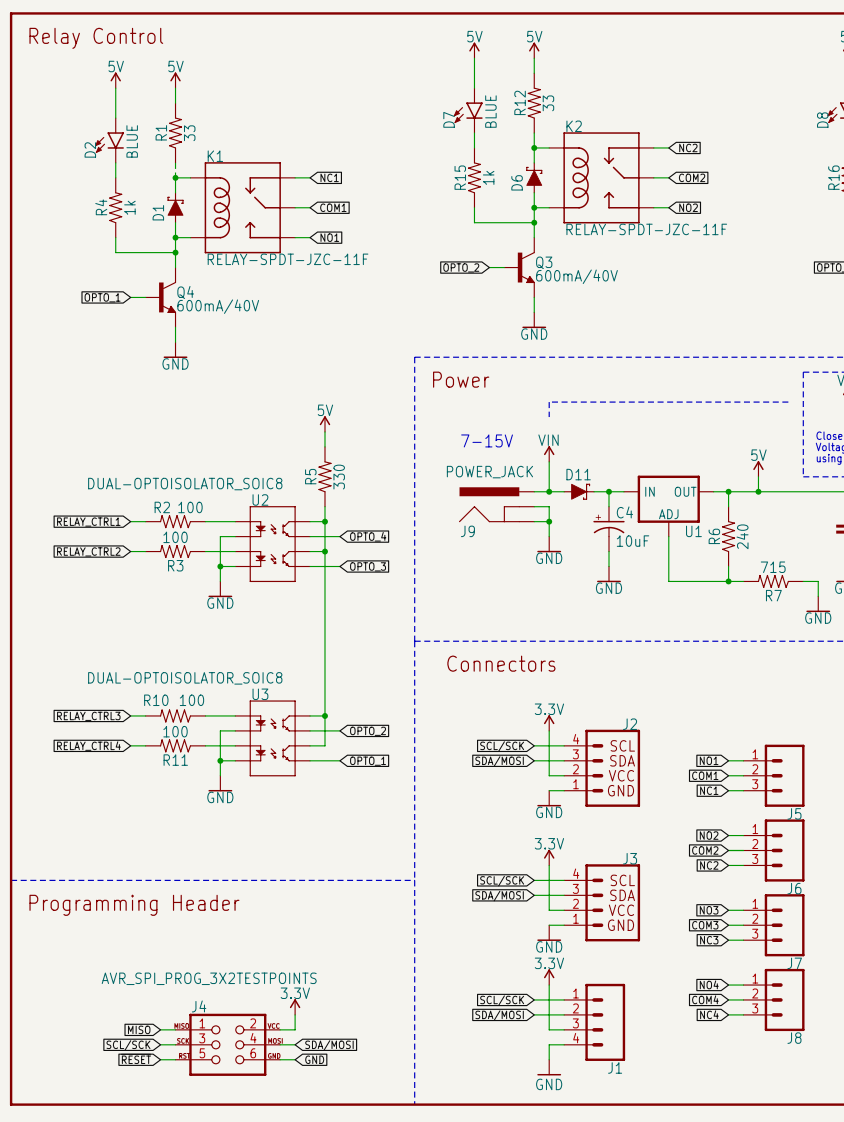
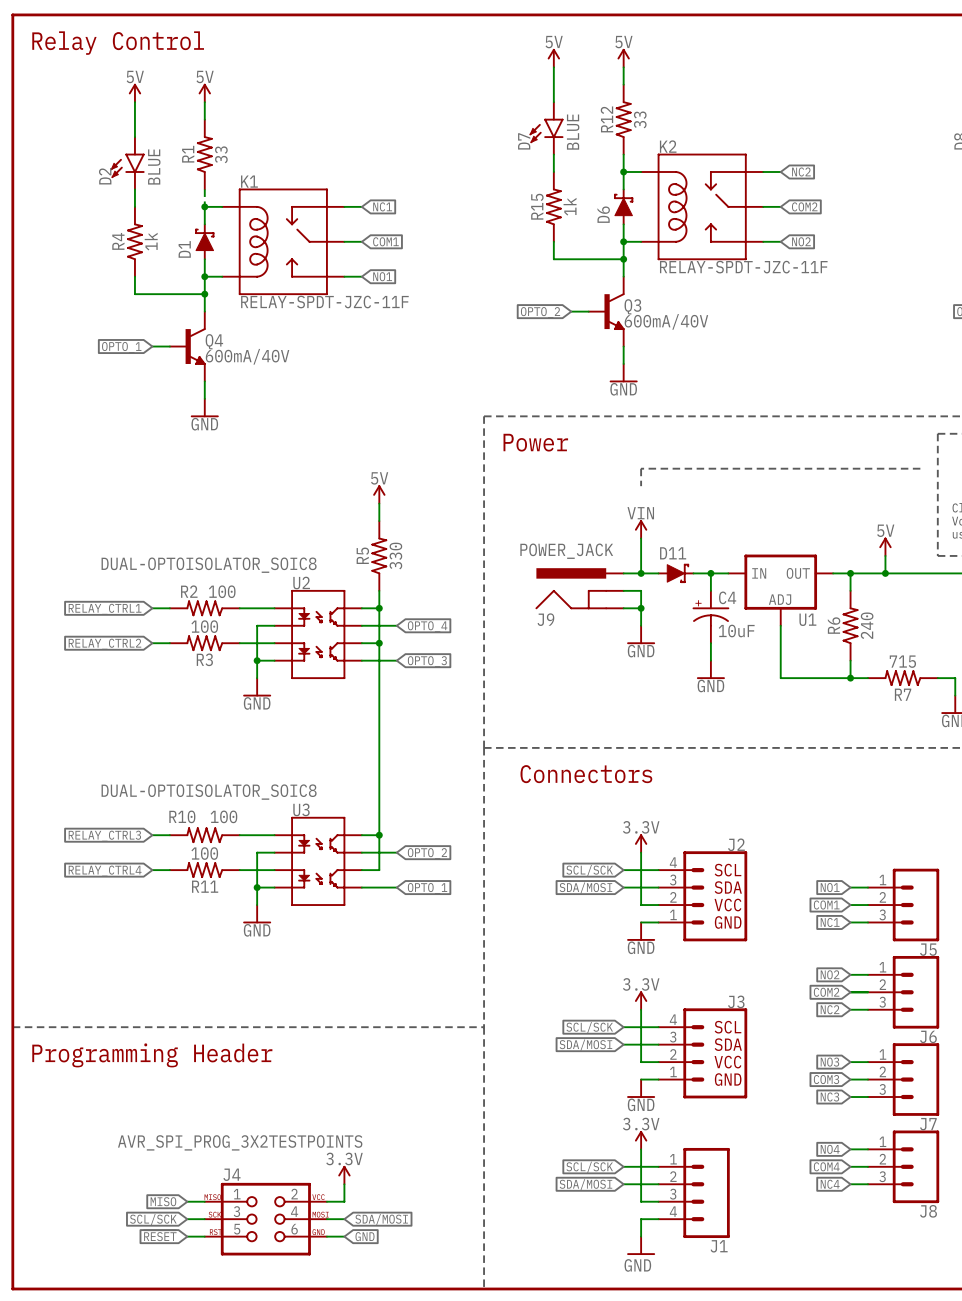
text: 7-15V (487, 440) -> none

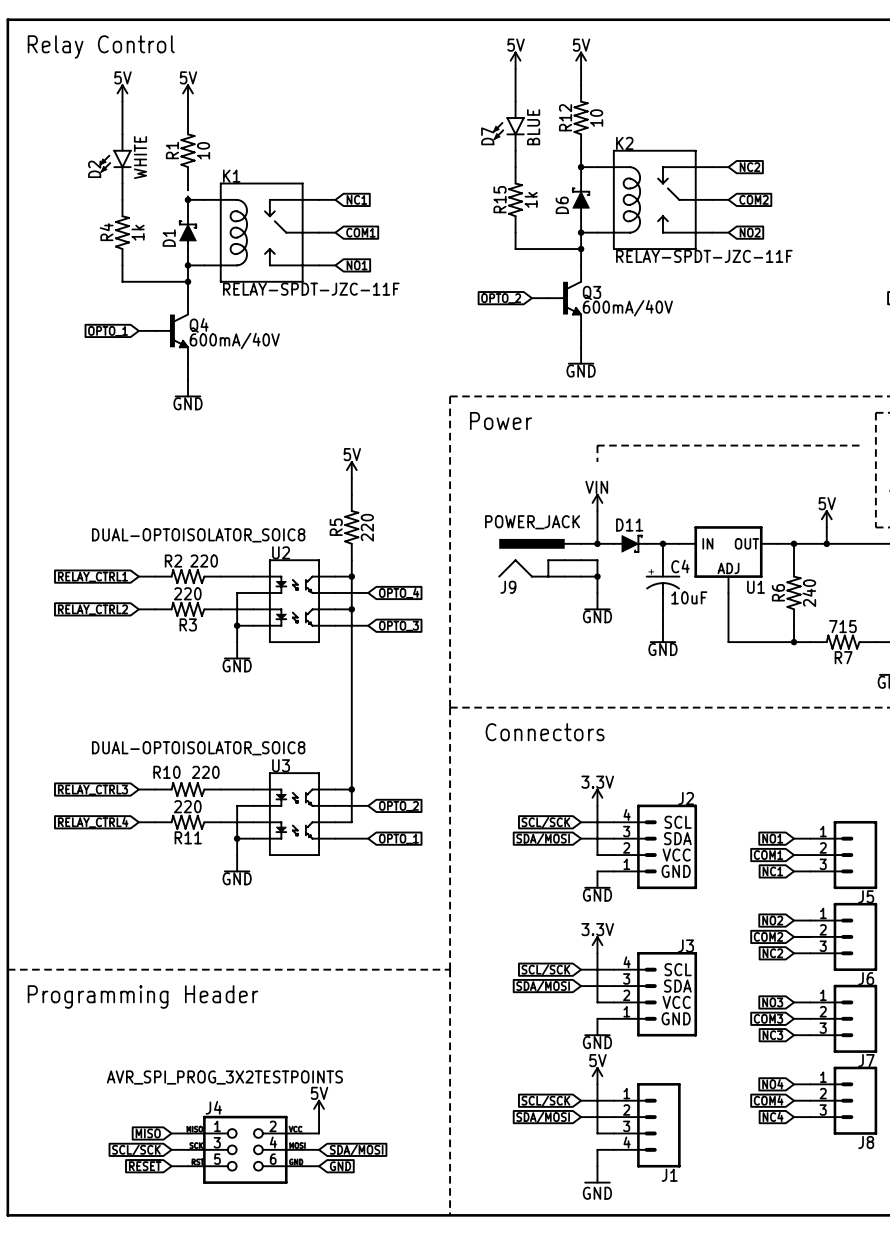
R12 value: 33 (640, 119) -> 10 (596, 118)
R1 value: 33 (221, 154) -> 10 (203, 150)
D2 value: BLUE (154, 166) -> WHITE (140, 157)
R5 value: 330 (395, 556) -> 220 (367, 527)
R2 value: 100 (222, 591) -> 220 (204, 561)
R3 value: 100 (204, 626) -> 220 (187, 593)
R10 value: 100 (223, 816) -> 220 (205, 772)
R11 value: 100 (204, 853) -> 220 (187, 806)
power symbol: 3.3V (641, 1140) -> 5V (597, 1075)
power symbol: 3.3V (344, 1175) -> 5V (319, 1108)

